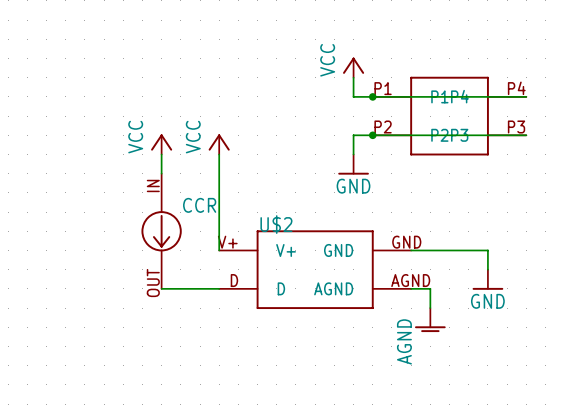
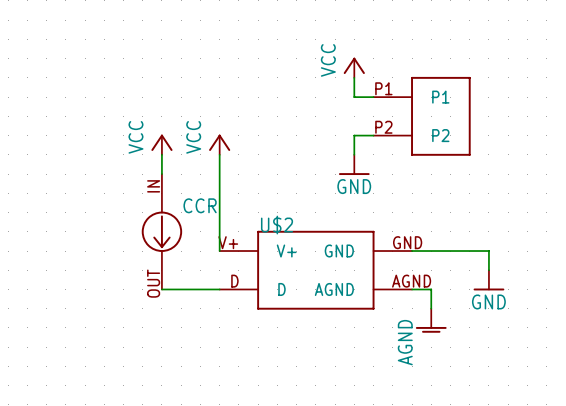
wire: (372, 96) (526, 96) -> none
junction: (372, 96) -> none
part: none -> (422, 116)
part: (449, 116) -> none
wire: (372, 135) (526, 135) -> none
junction: (372, 135) -> none

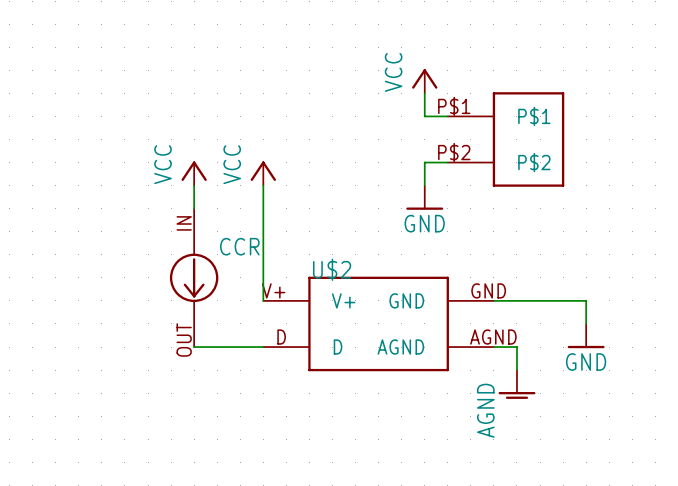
part pin number: P1 (383, 88) -> P$1 (454, 106)
part pin name: P1 (440, 97) -> P$1 (534, 116)
part pin number: P2 (383, 127) -> P$2 (454, 152)
part pin name: P2 (440, 135) -> P$2 (534, 162)

